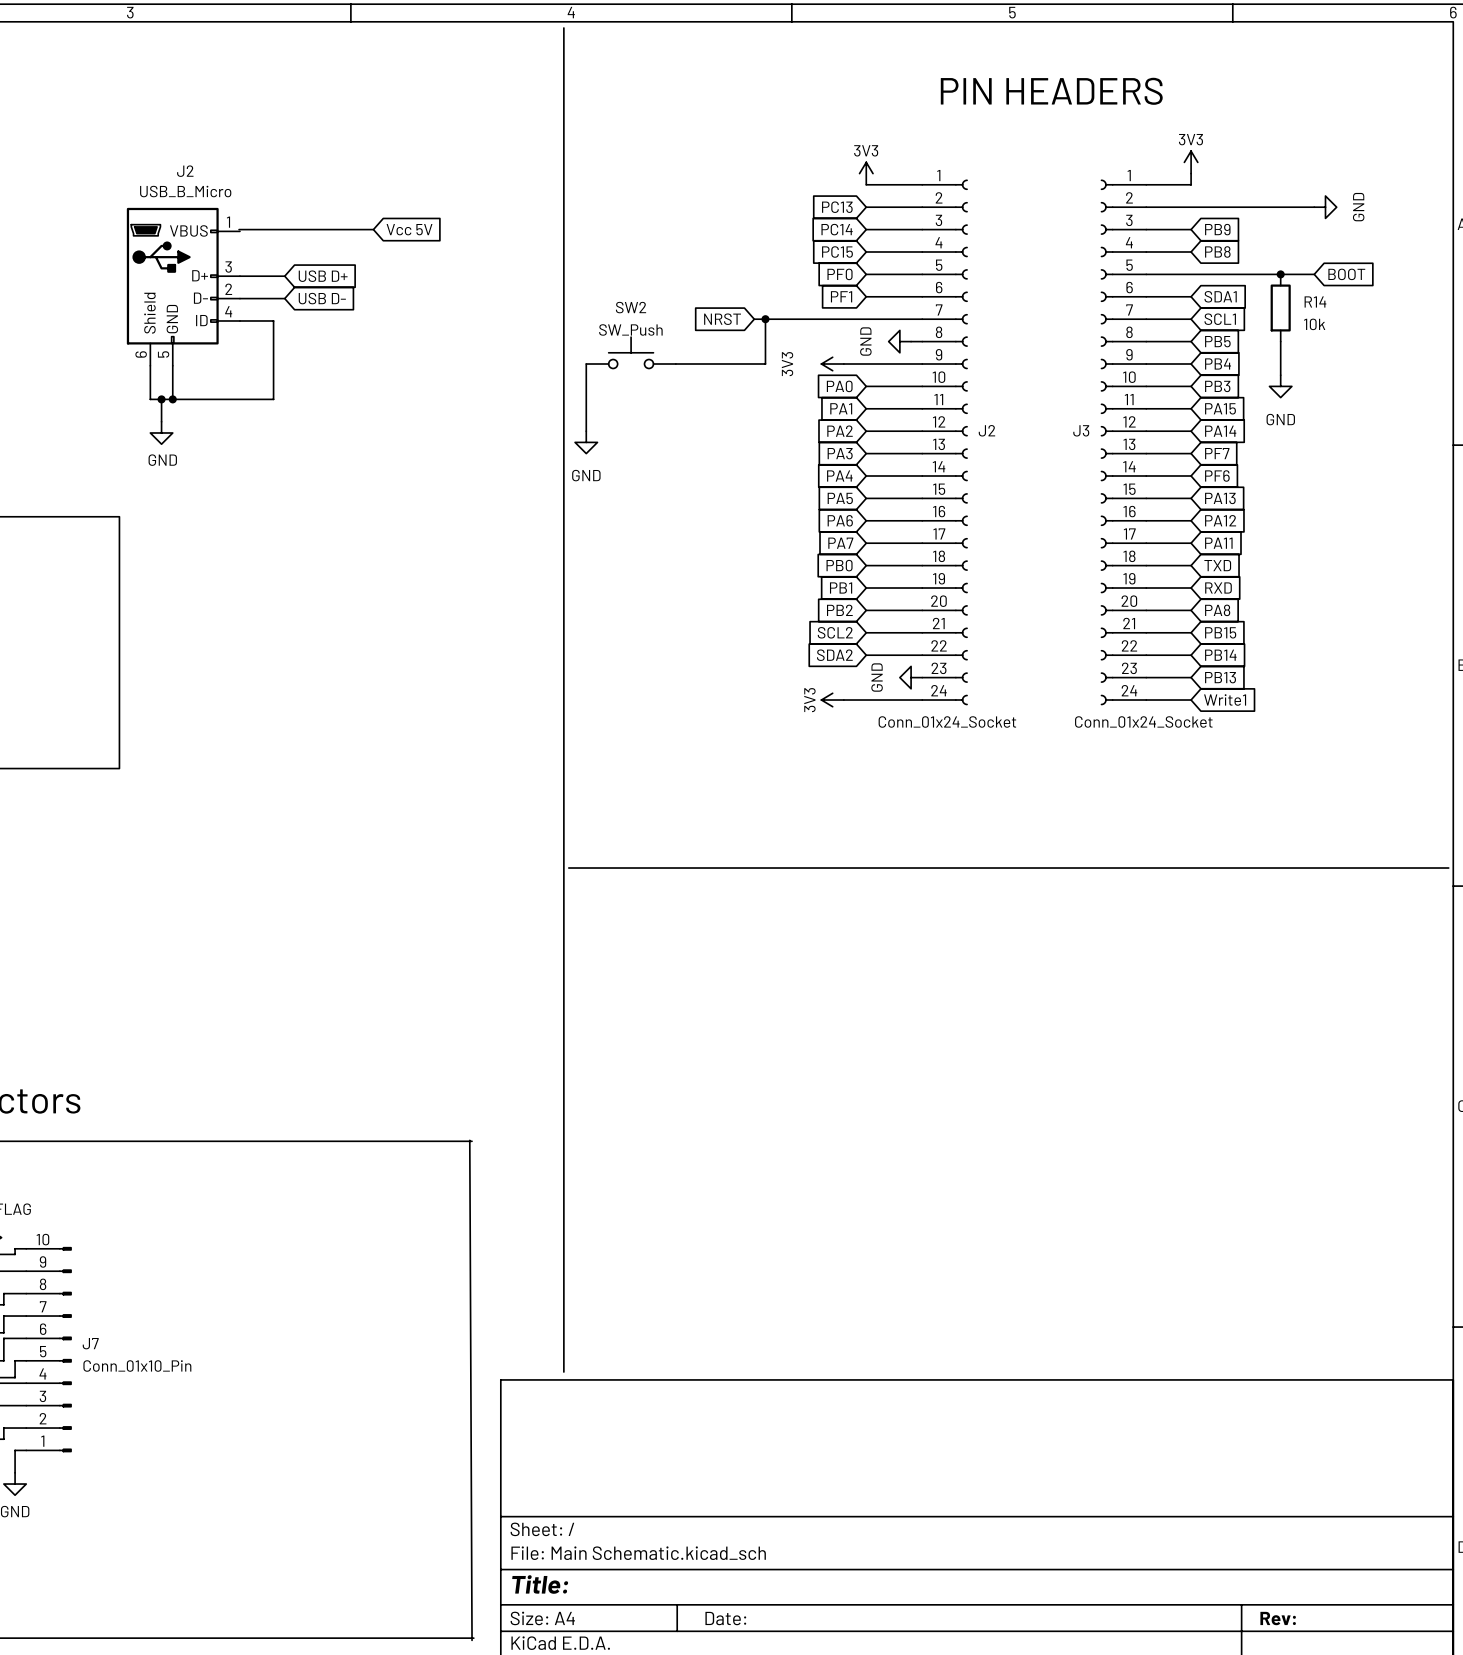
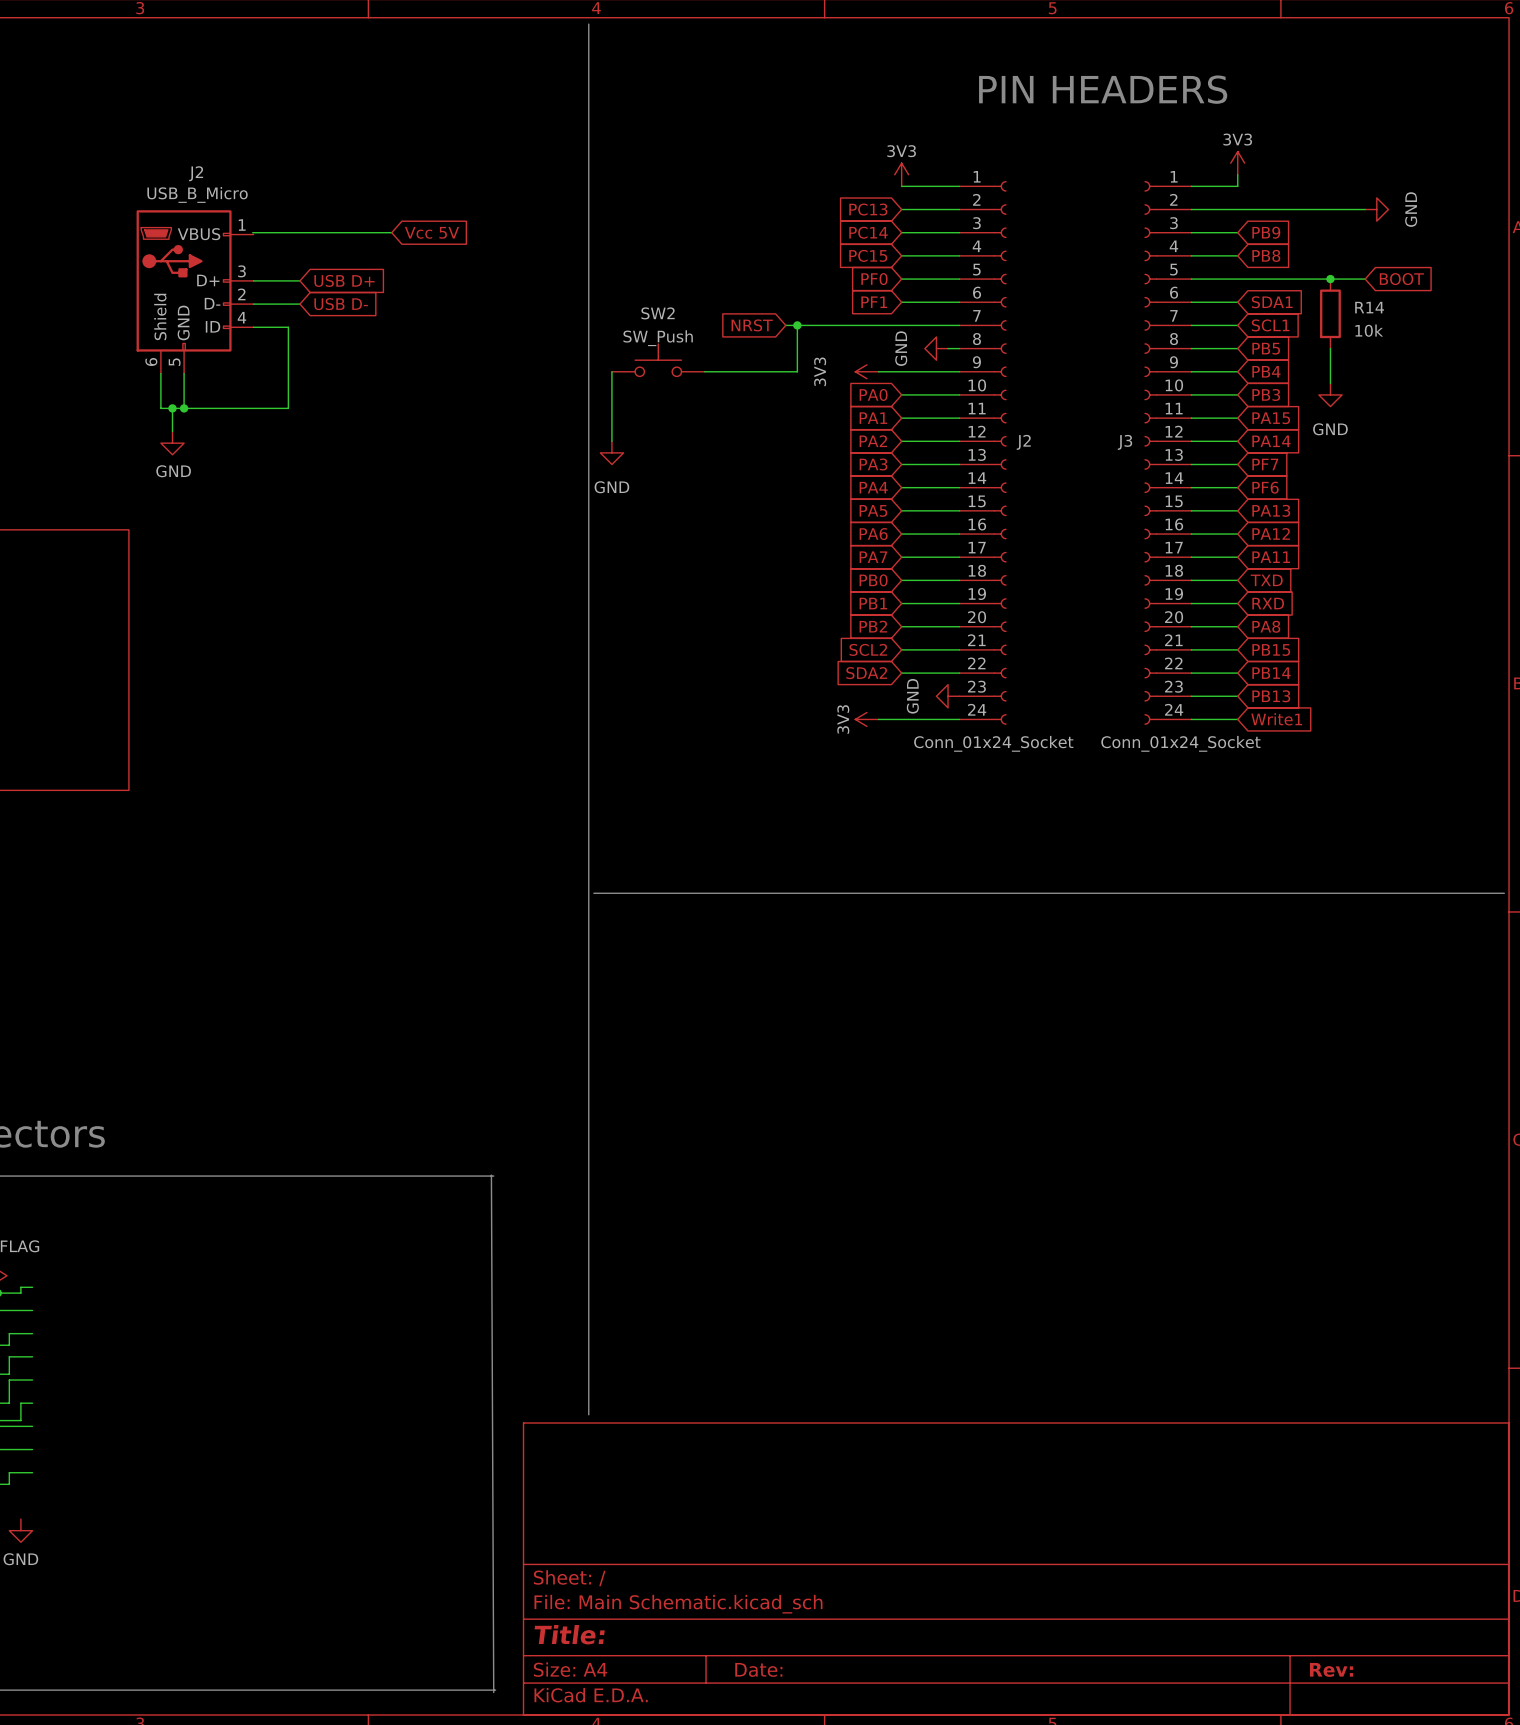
J7: Conn_01x10_Pin (49, 1349) -> none
wire: (26, 1450) (15, 1450) (15, 1472) -> none

